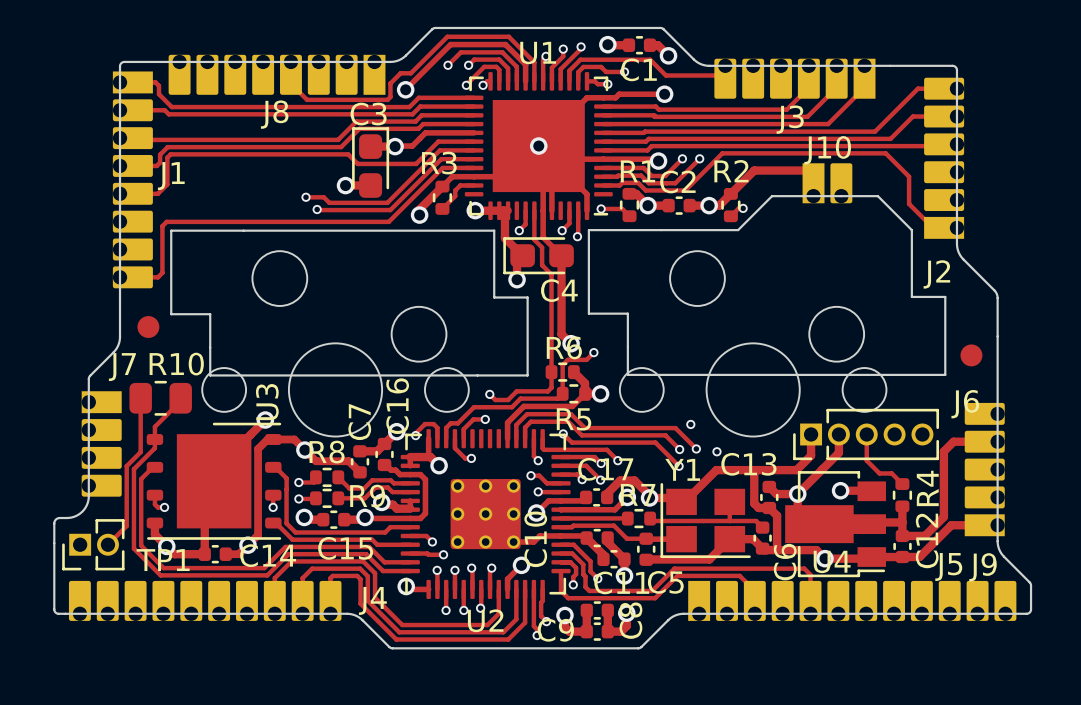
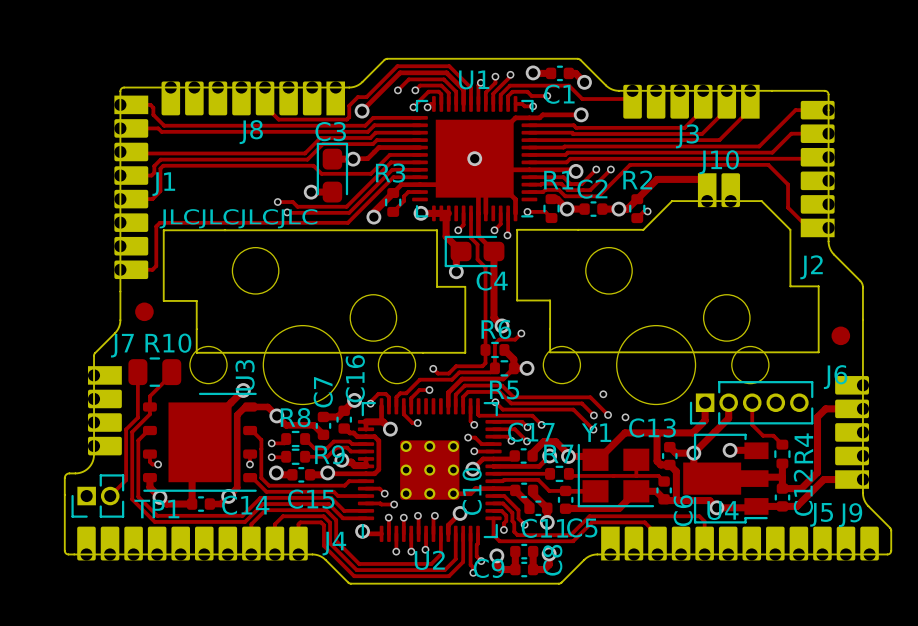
text: none -> JLCJLCJLCJLC (238, 218)

